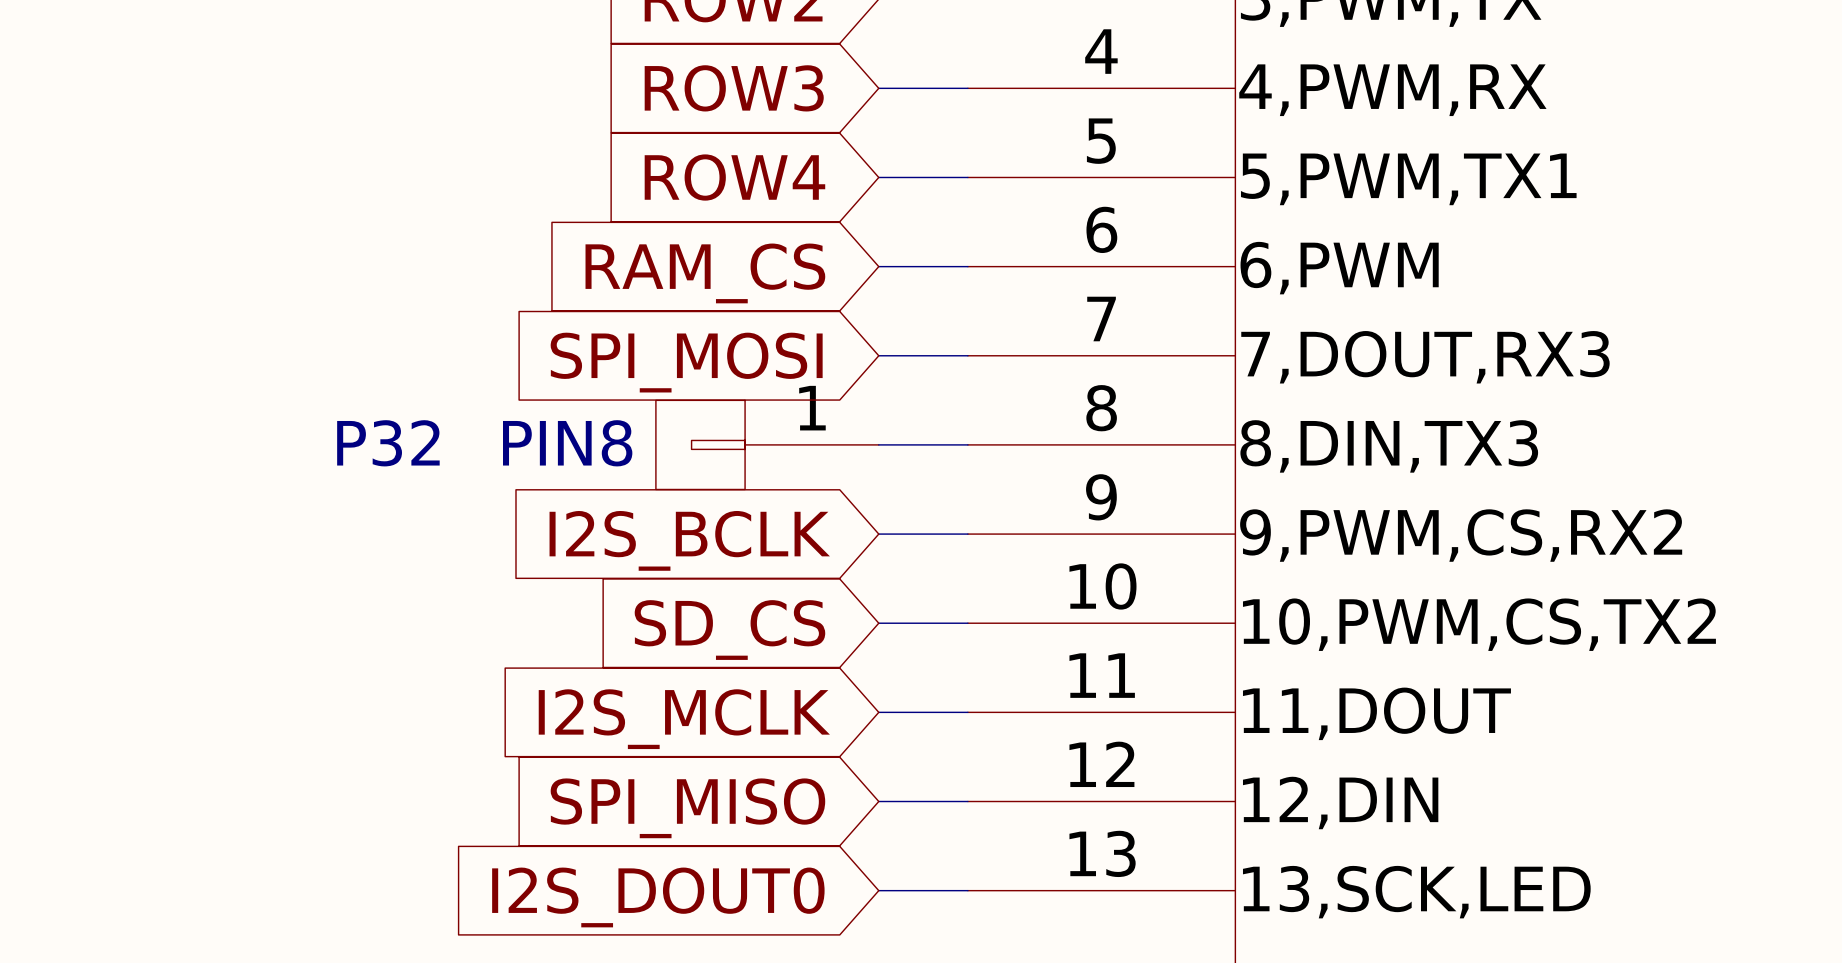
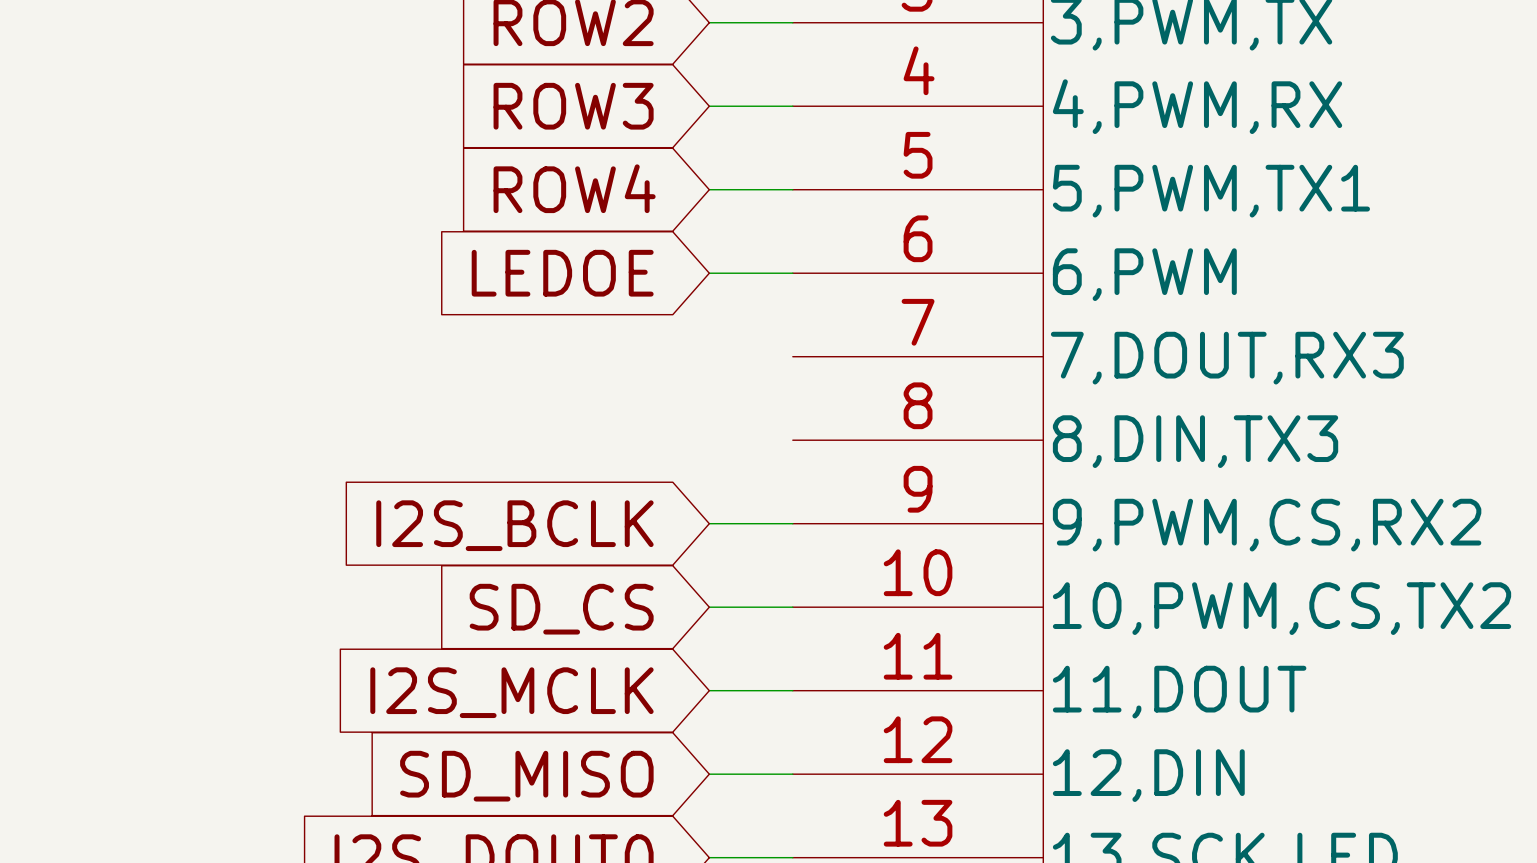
global label: RAM_CS (705, 273) -> LEDOE (562, 273)
wire: (878, 355) (967, 355) -> none
global label: SPI_MOSI (686, 362) -> none
P32: PIN8 (767, 444) -> none
wire: (878, 444) (967, 444) -> none
global label: SPI_MISO (687, 808) -> SD_MISO (526, 776)

